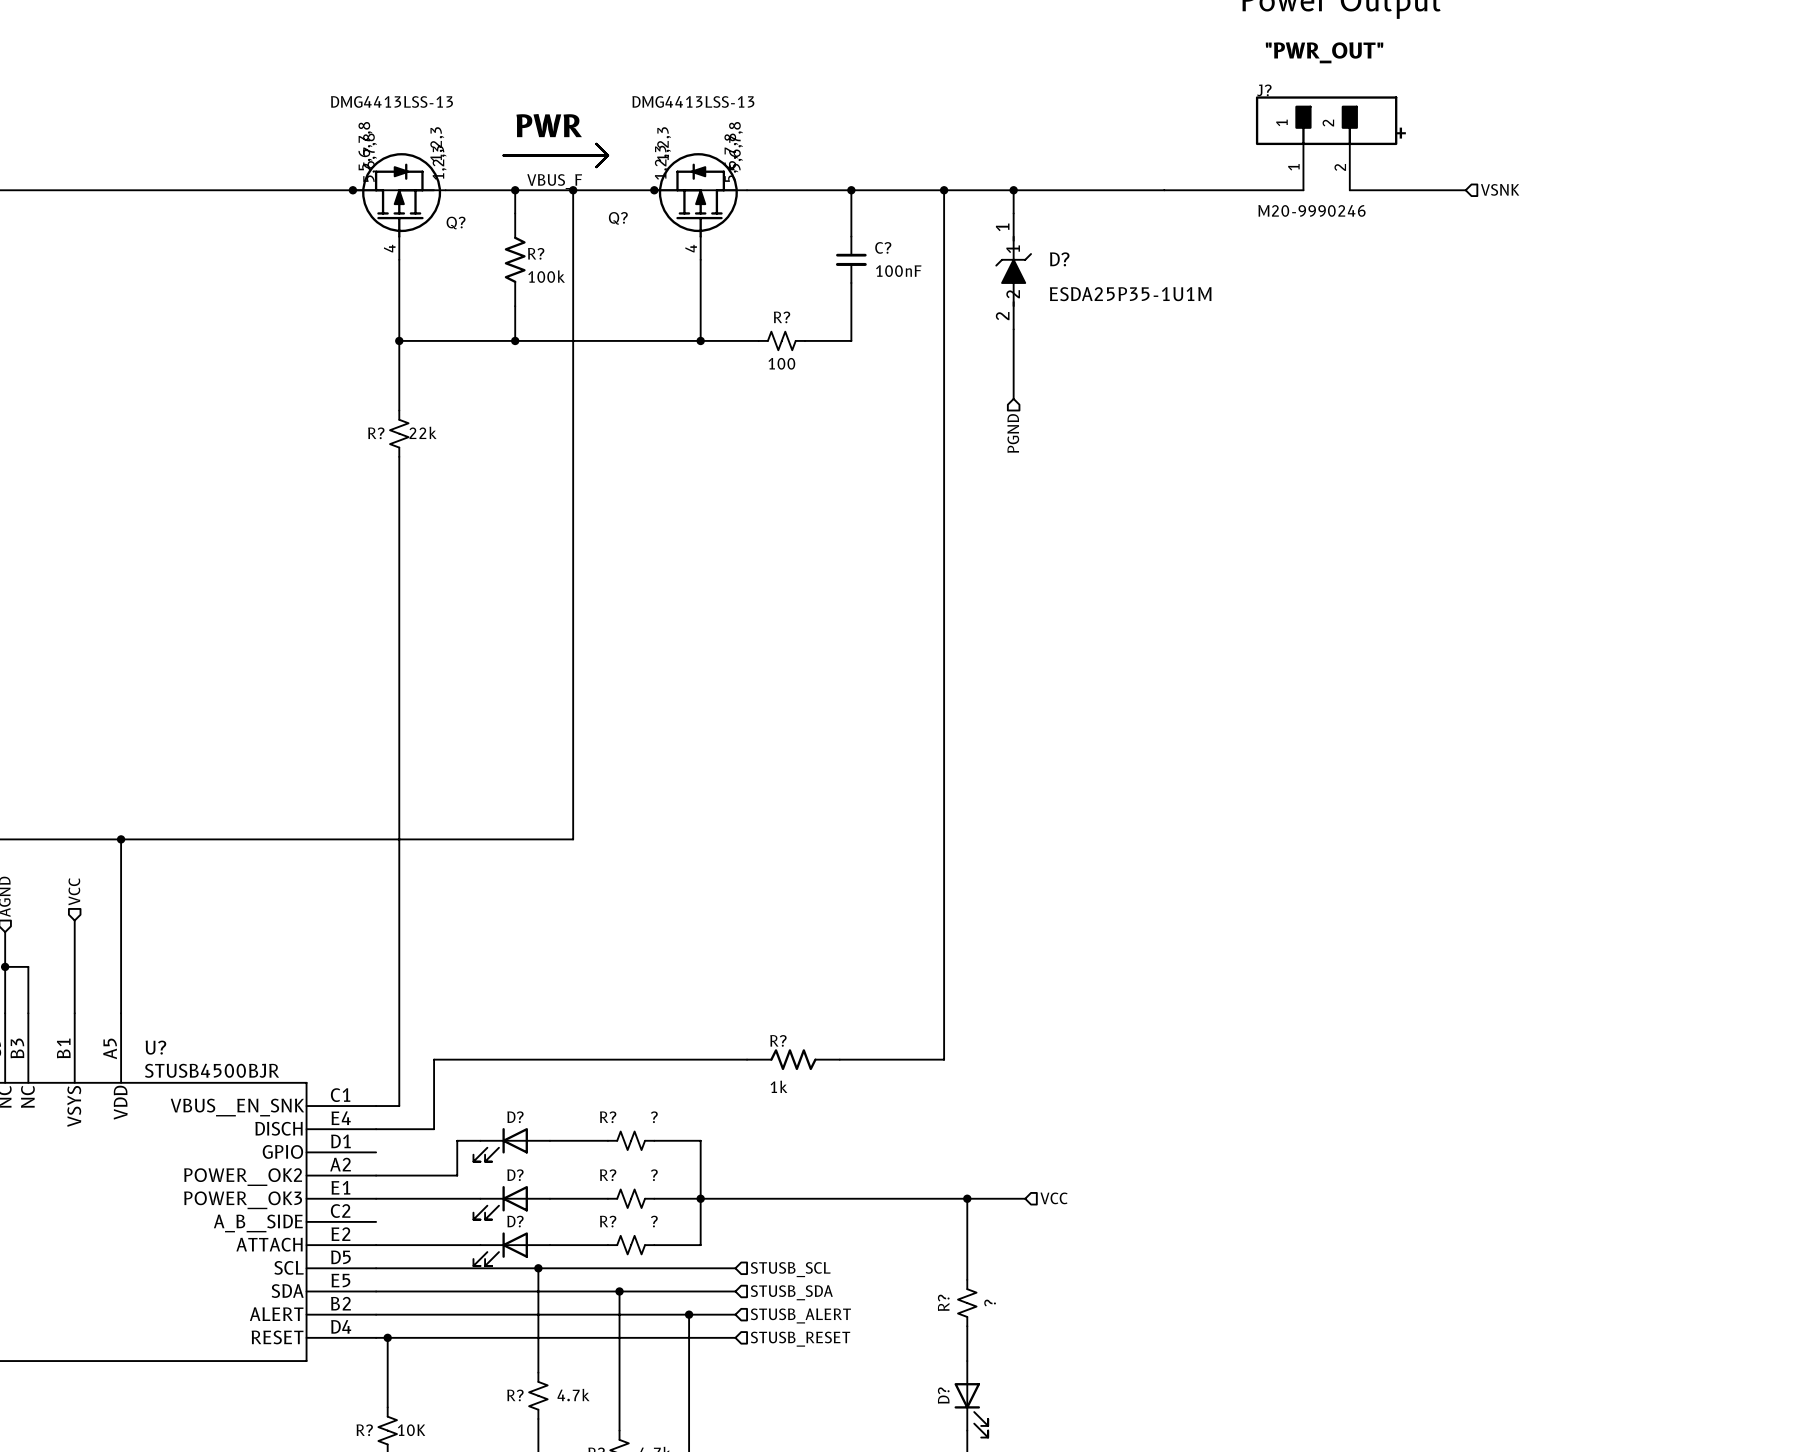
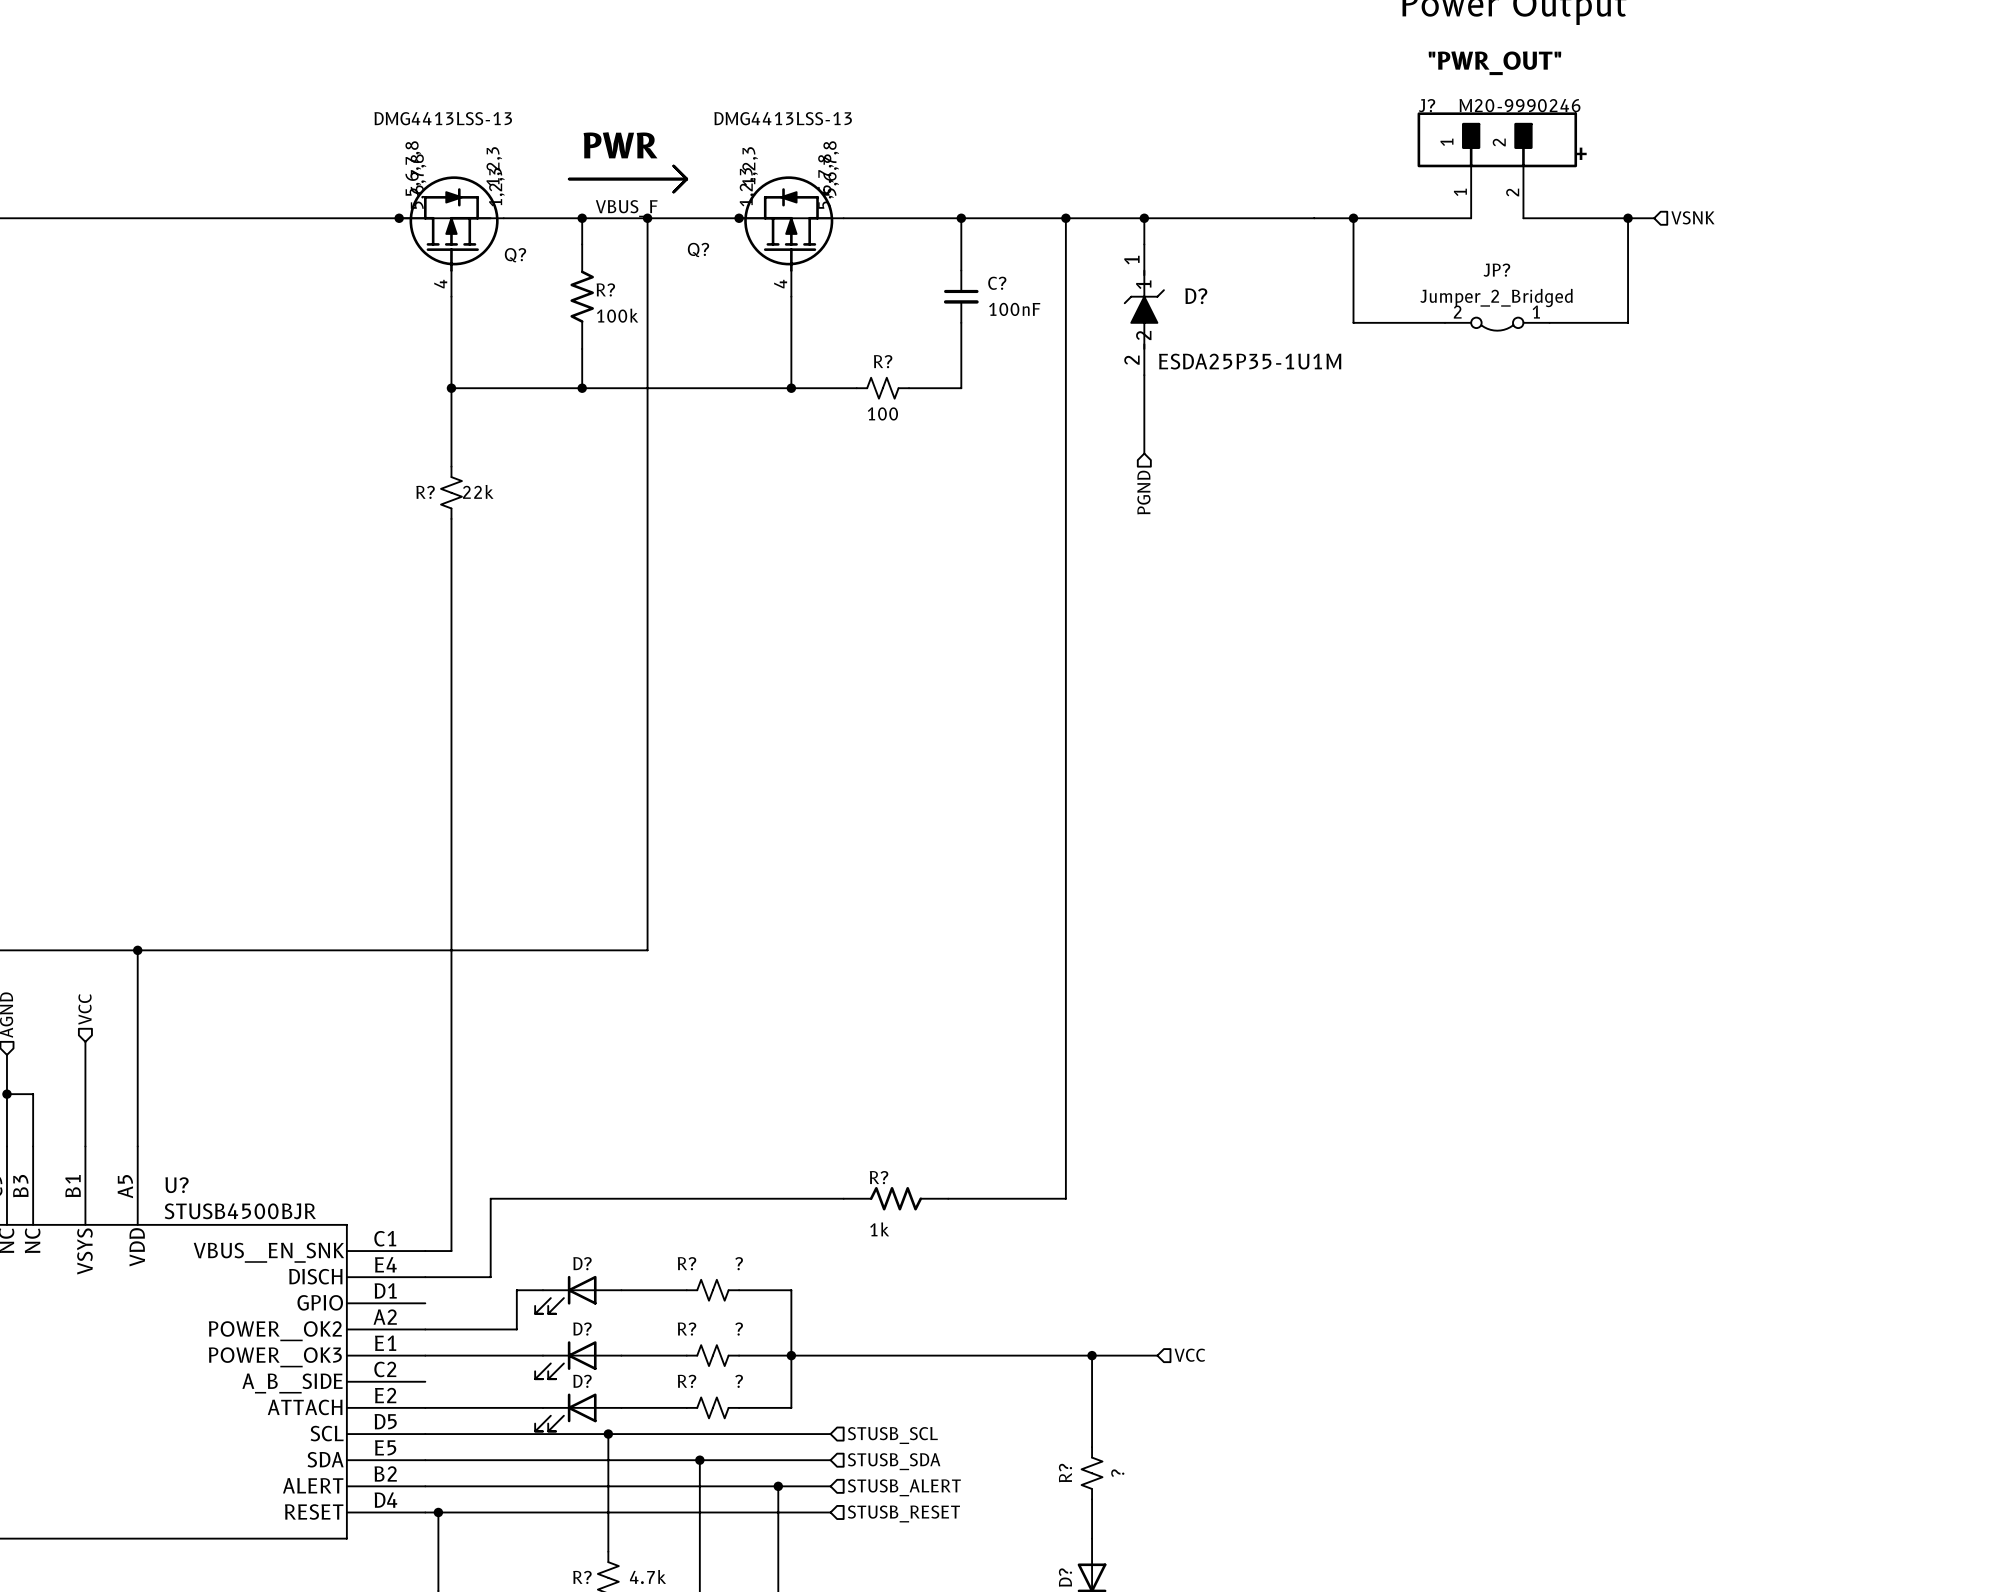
wire: none -> (1353, 218) (1353, 322) (1445, 322)
junction: none -> (1353, 218)
wire: none -> (1628, 218) (1628, 322) (1549, 322)
junction: none -> (1628, 218)
J? value position: M20-9990246 (1311, 210) -> M20-9990246 (1520, 105)
JP?: none -> Jumper_2_Bridged (1497, 324)
D? value position: ESDA25P35-1U1M (1130, 294) -> ESDA25P35-1U1M (1250, 361)

